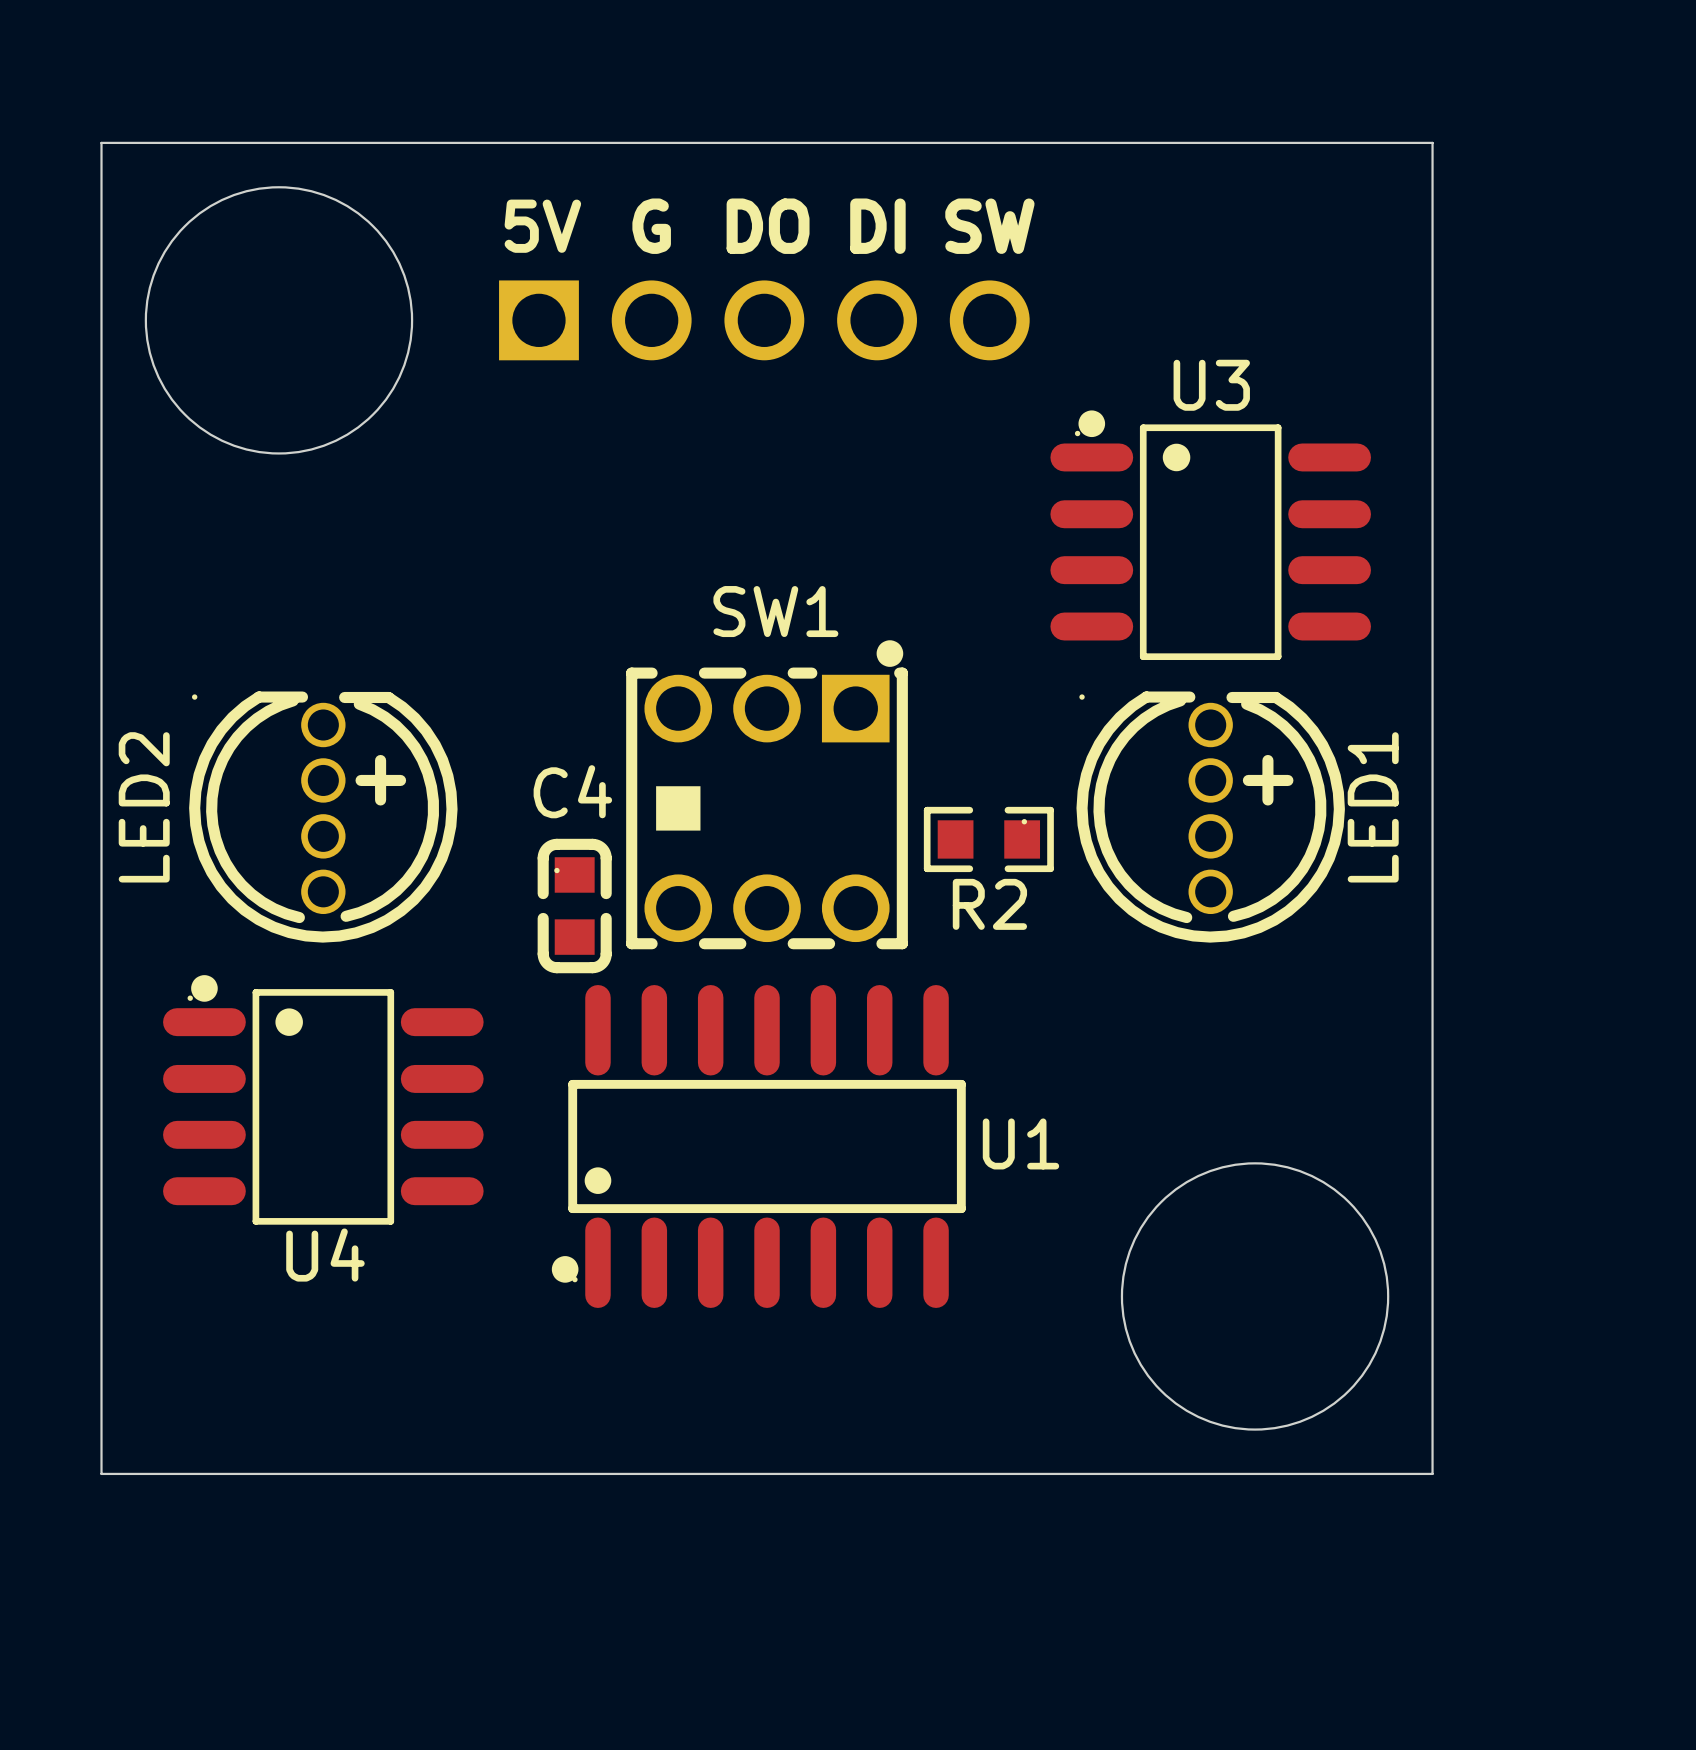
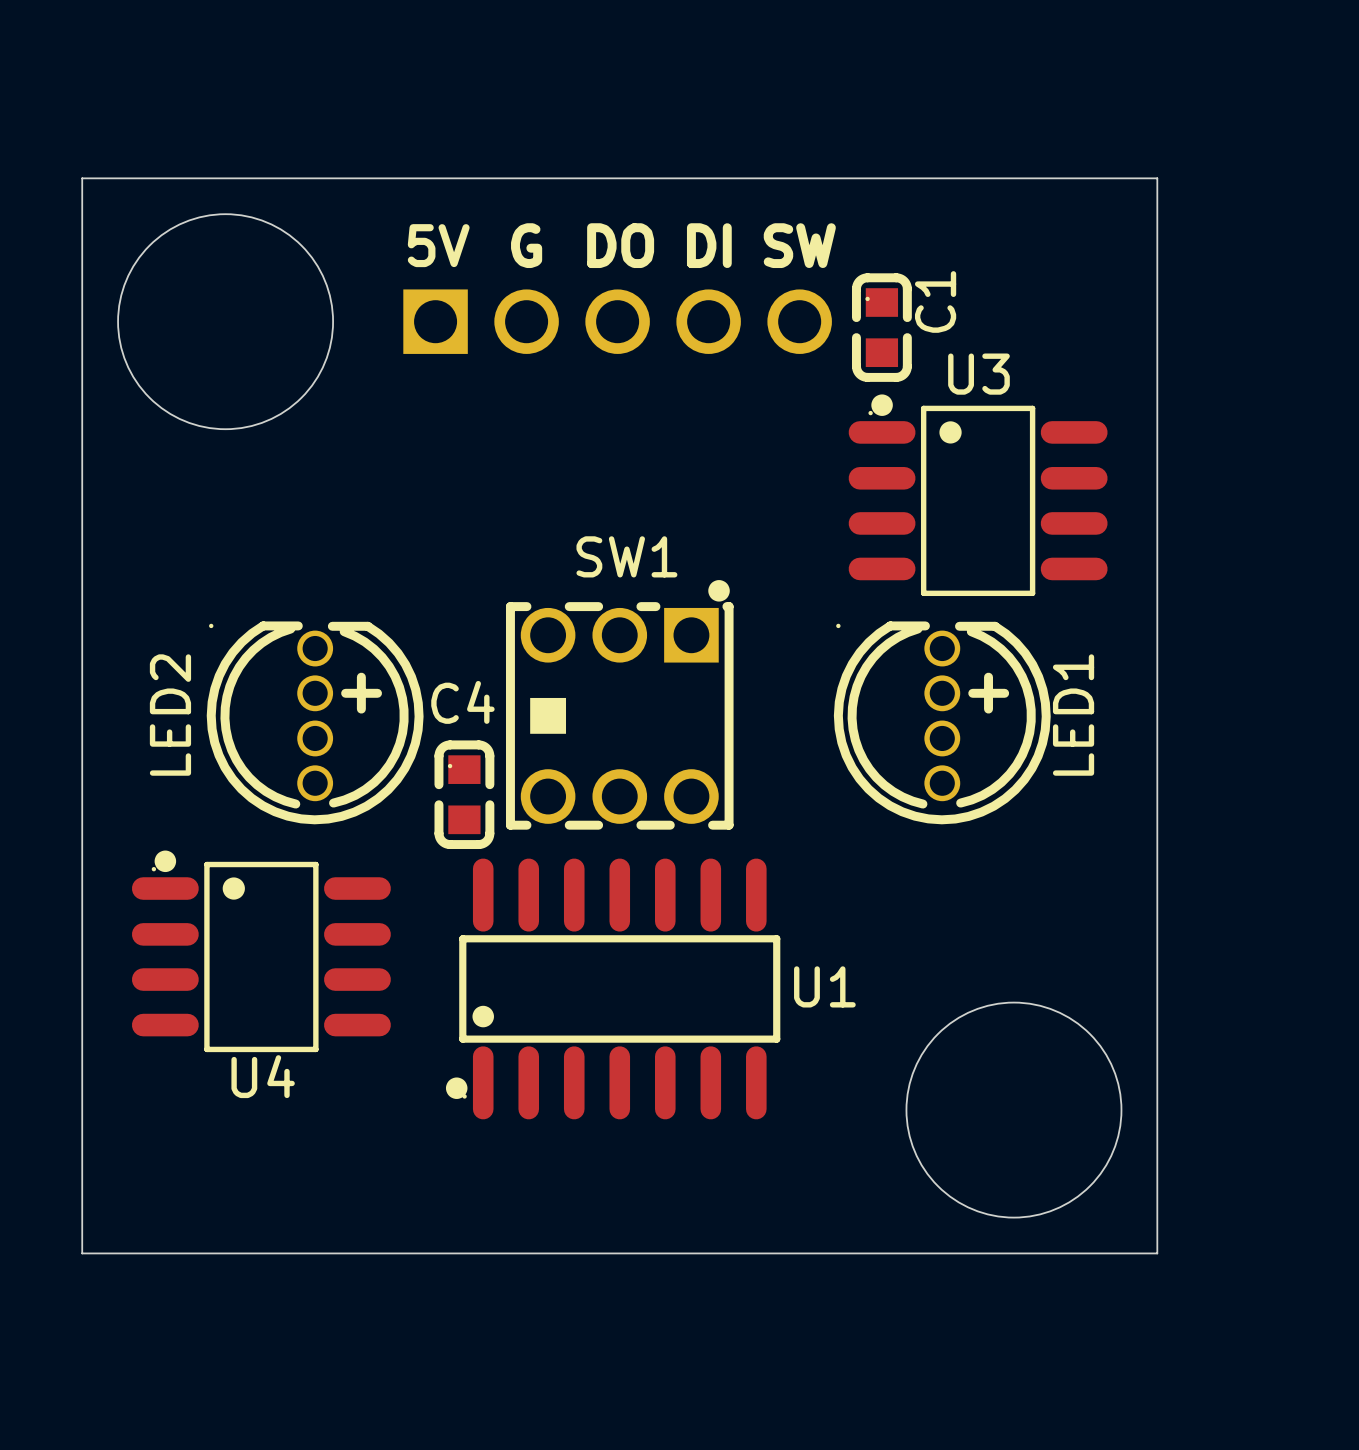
C1: none -> (881, 327)
LED2 position: (323, 817) -> (315, 722)
LED1 position: (1210, 817) -> (942, 722)
R2: (988, 839) -> none

